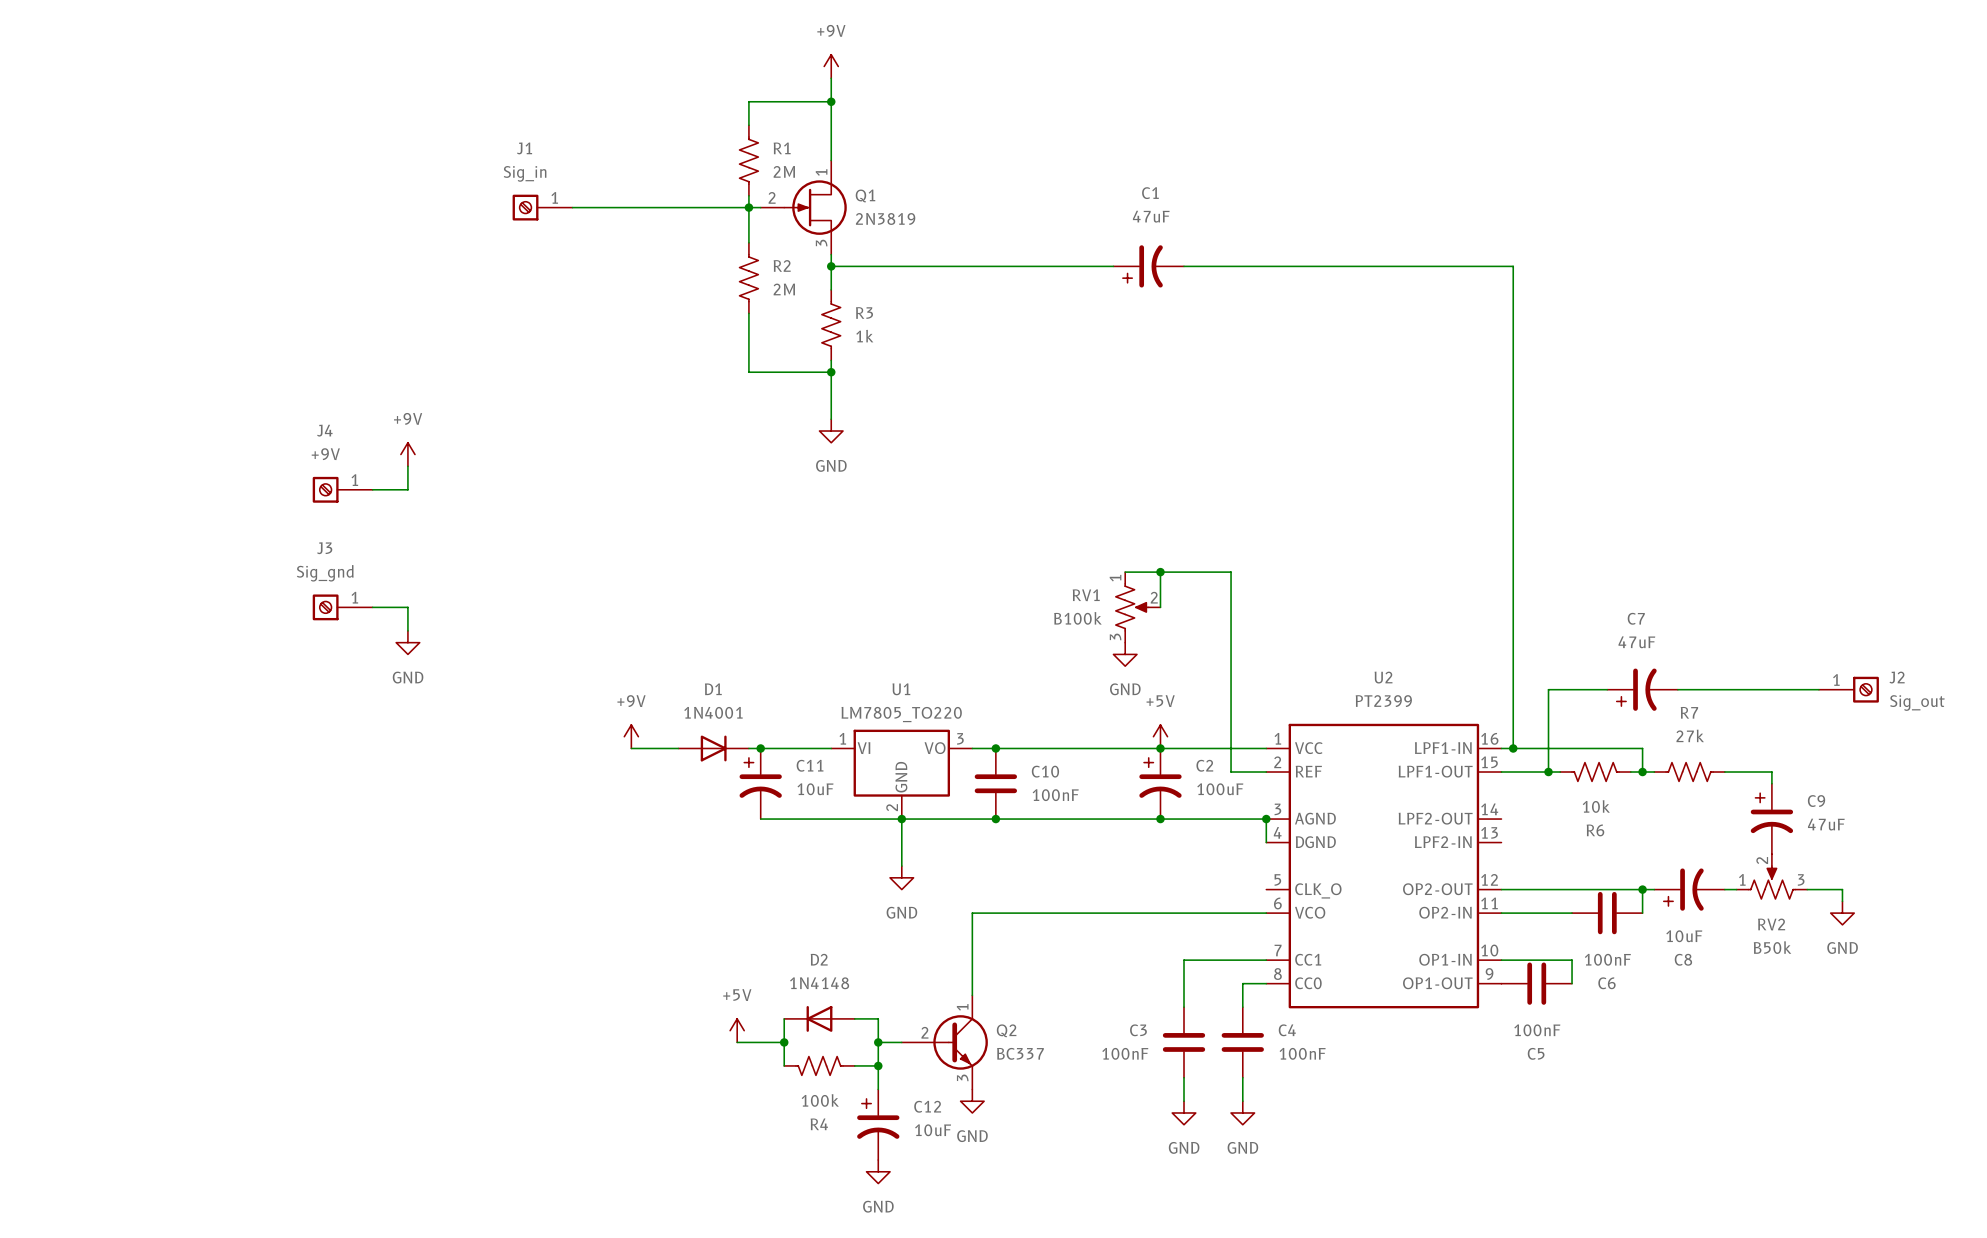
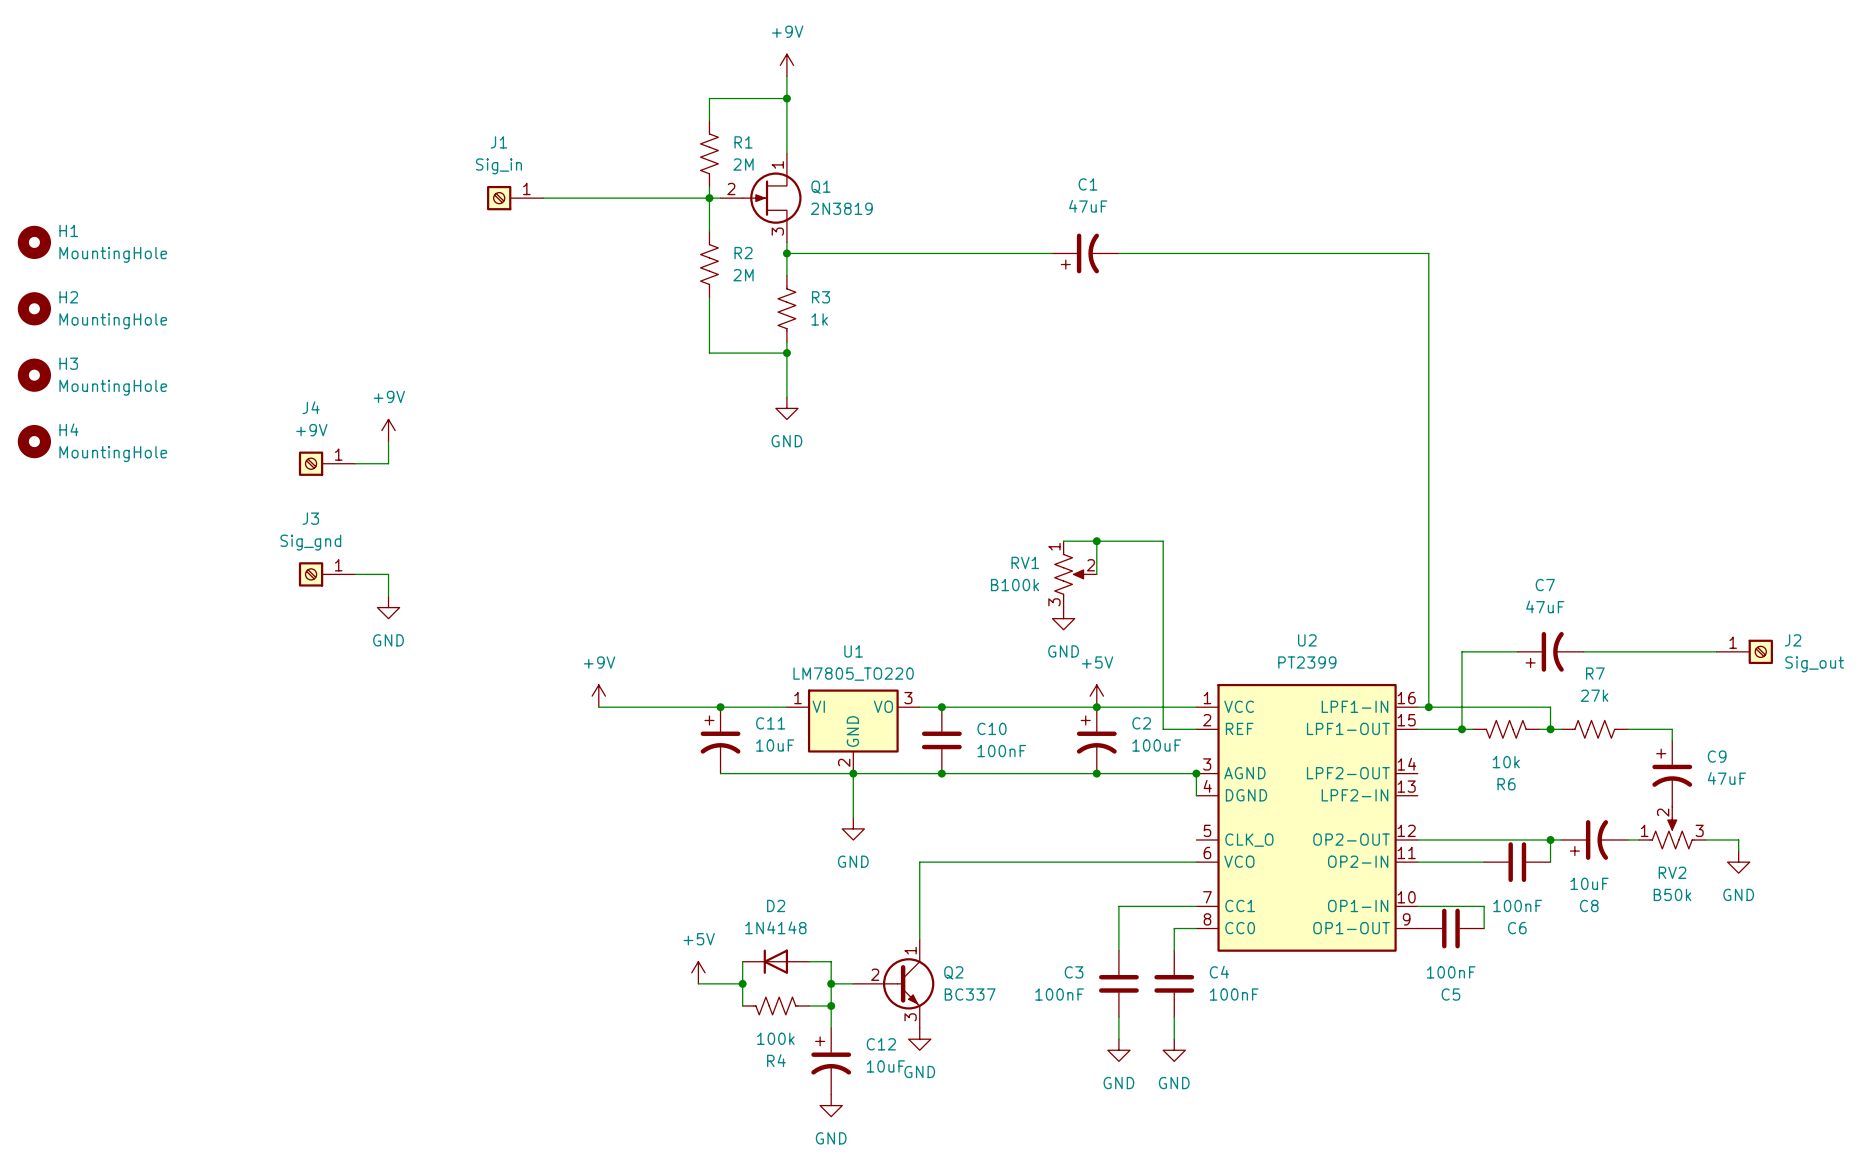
H1: none -> MountingHole (34, 242)
H2: none -> MountingHole (34, 308)
H3: none -> MountingHole (34, 375)
H4: none -> MountingHole (34, 441)
D1: 1N4001 (713, 748) -> none

